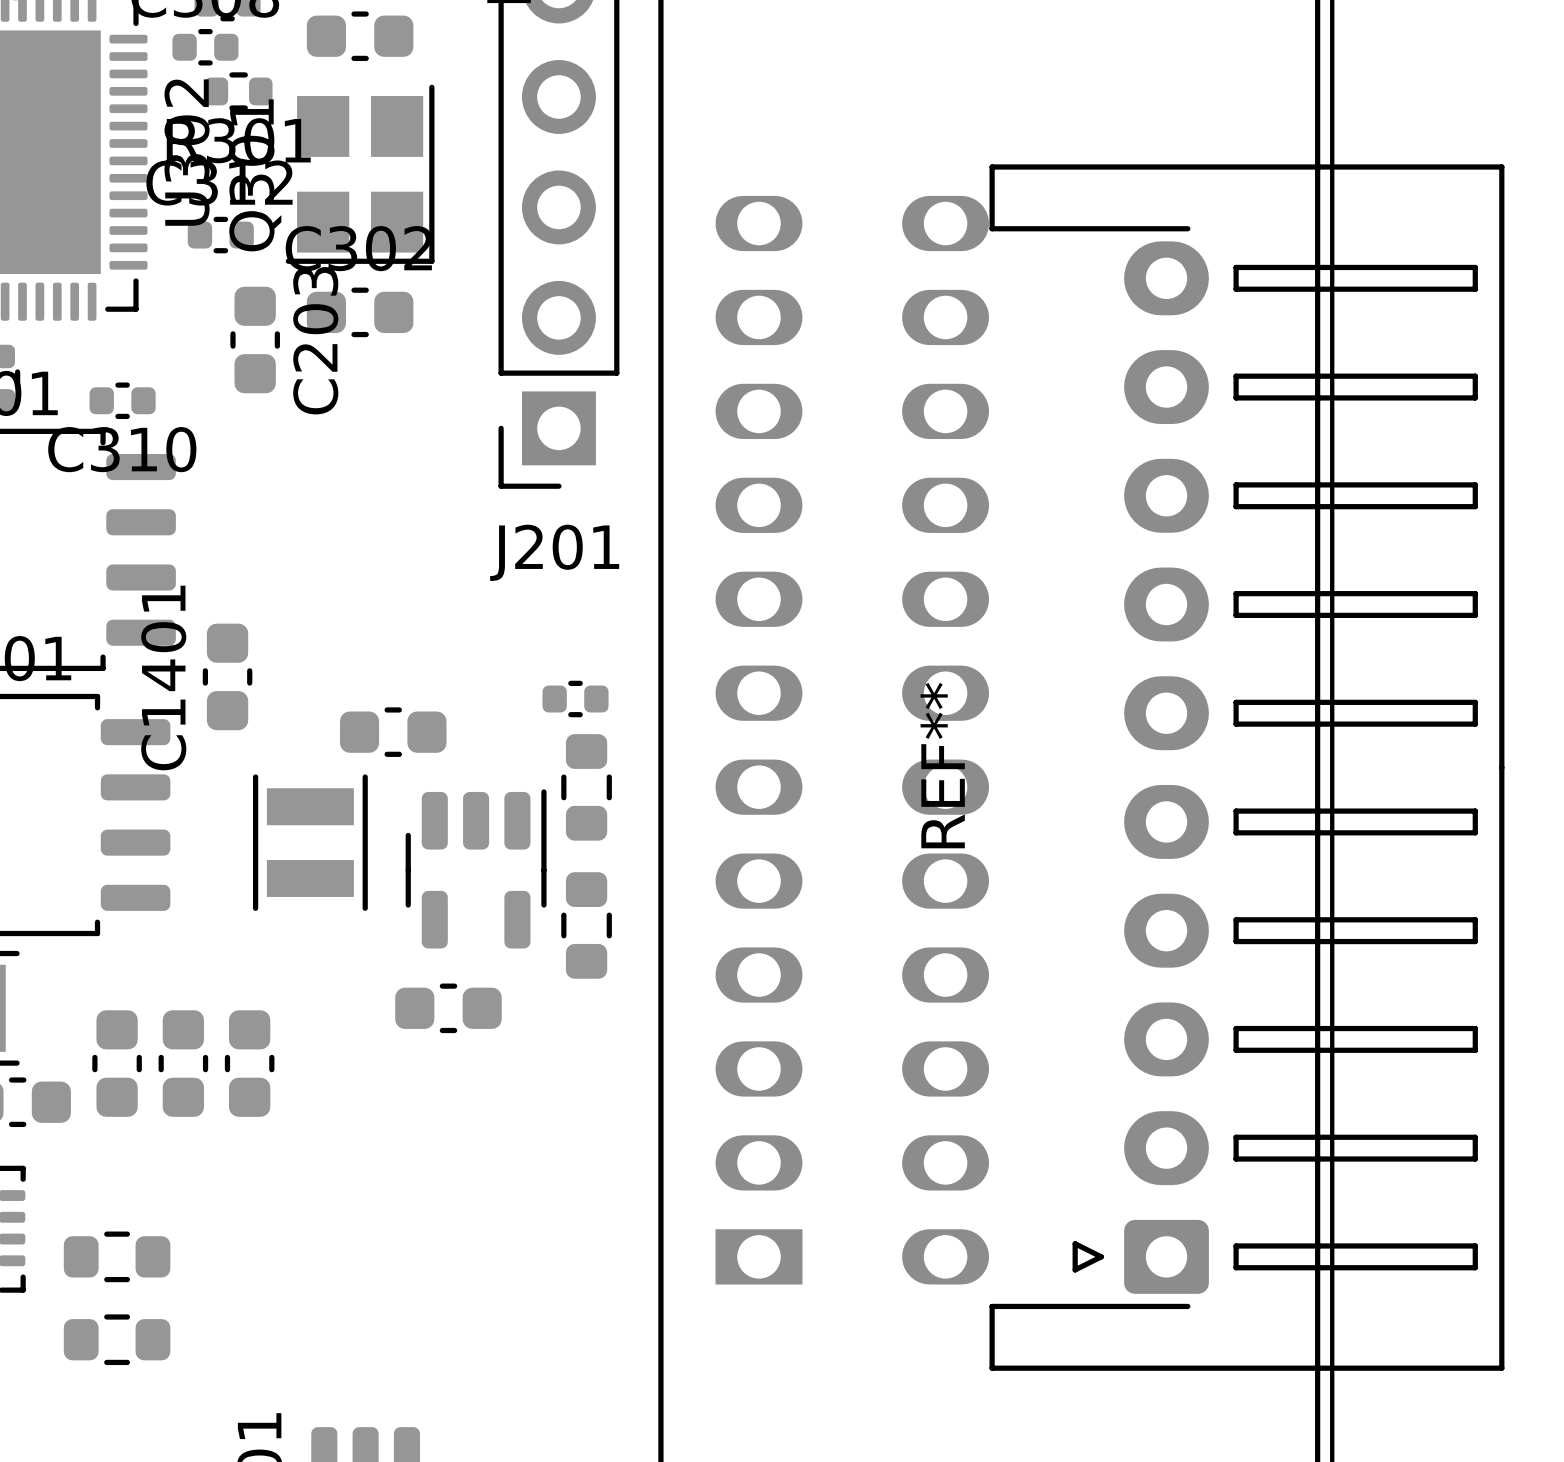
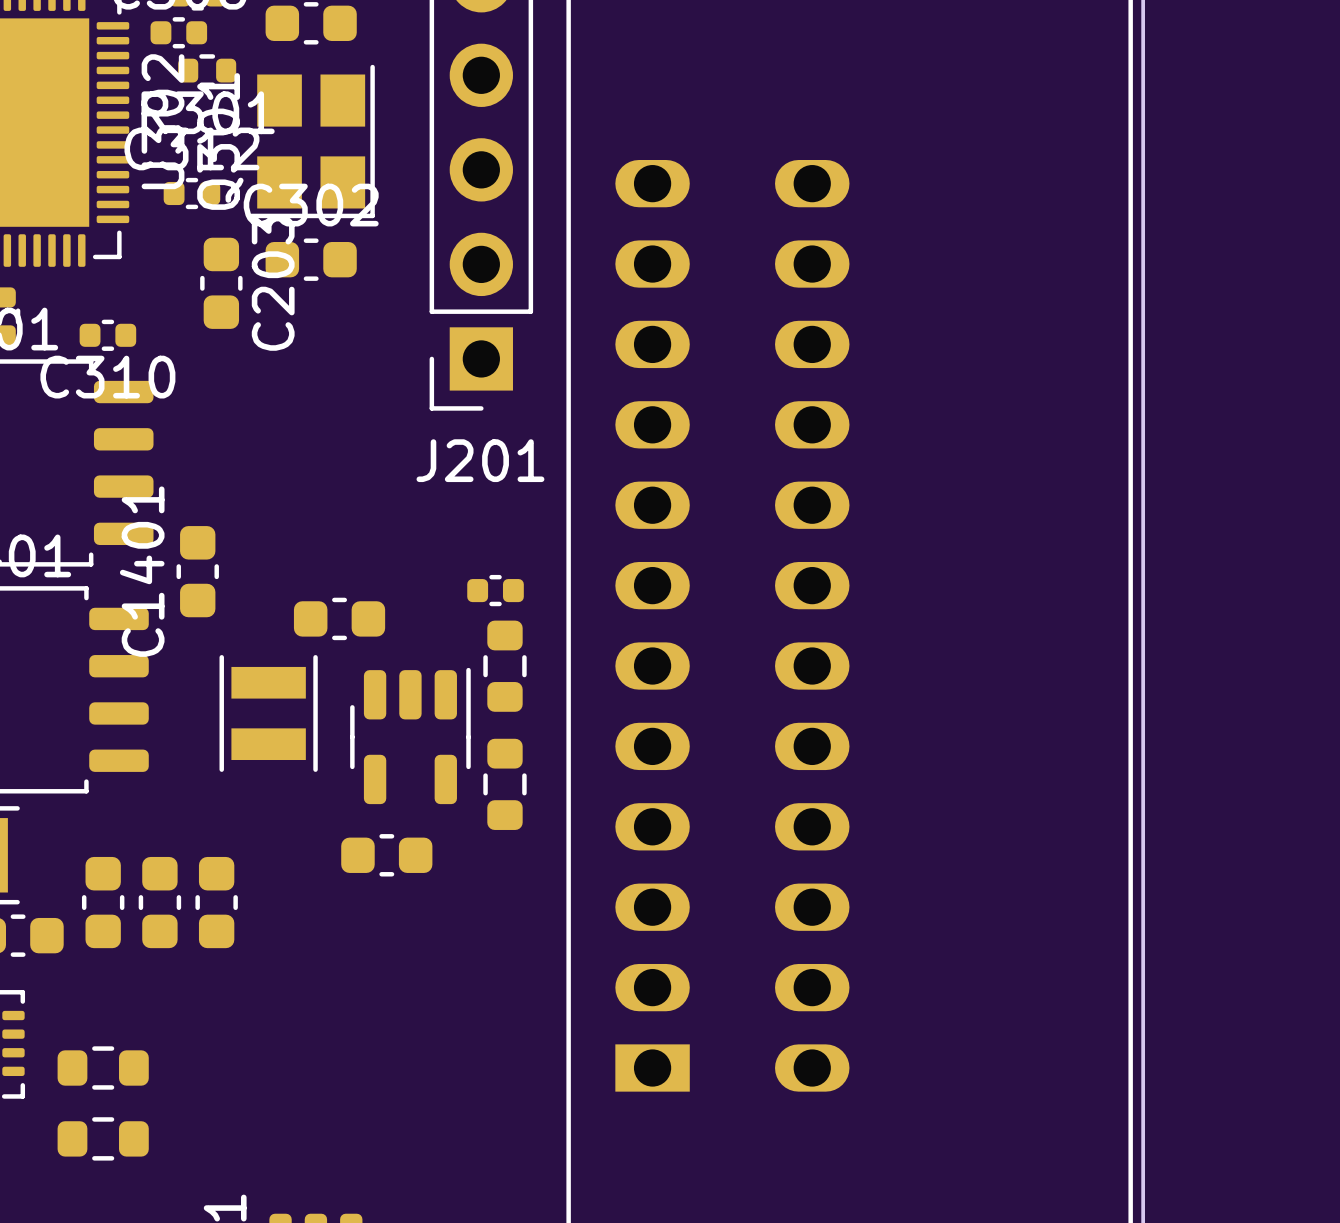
REF**: (1246, 767) -> none

